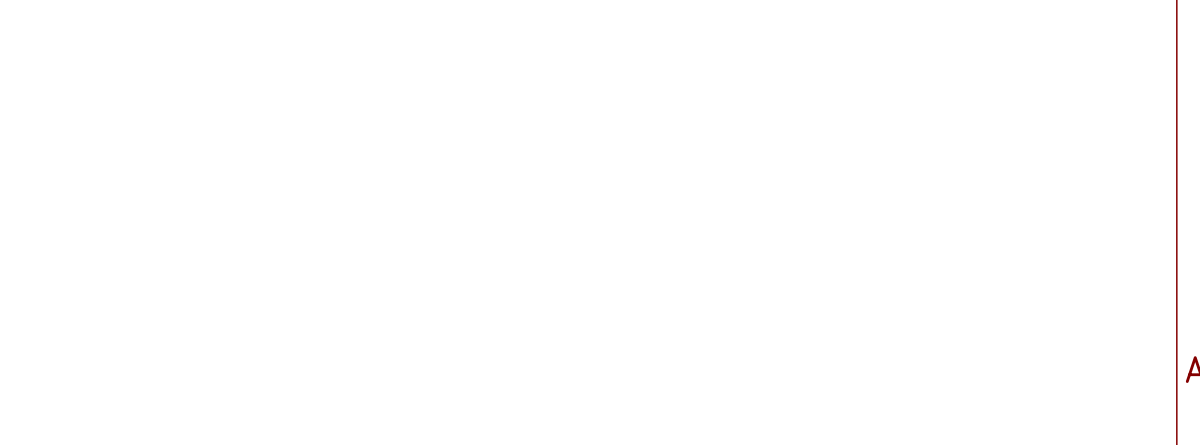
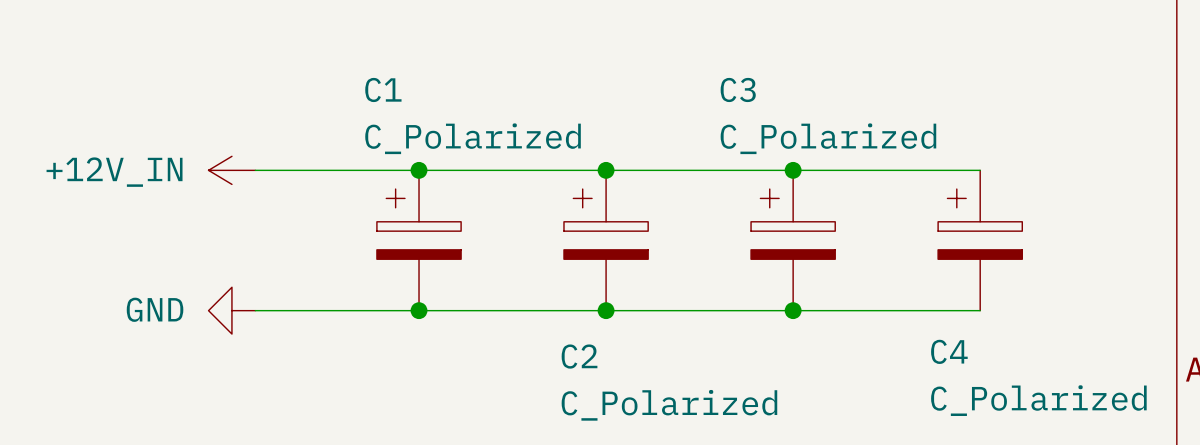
power symbol: none -> +12V_IN (231, 170)
wire: none -> (255, 170) (980, 170)
junction: none -> (419, 170)
junction: none -> (606, 170)
junction: none -> (793, 170)
C1: none -> C_Polarized (419, 240)
C2: none -> C_Polarized (606, 240)
C3: none -> C_Polarized (793, 240)
C4: none -> C_Polarized (980, 240)
power symbol: none -> GND (231, 310)
wire: none -> (255, 310) (980, 310)
junction: none -> (419, 310)
junction: none -> (606, 310)
junction: none -> (793, 310)

